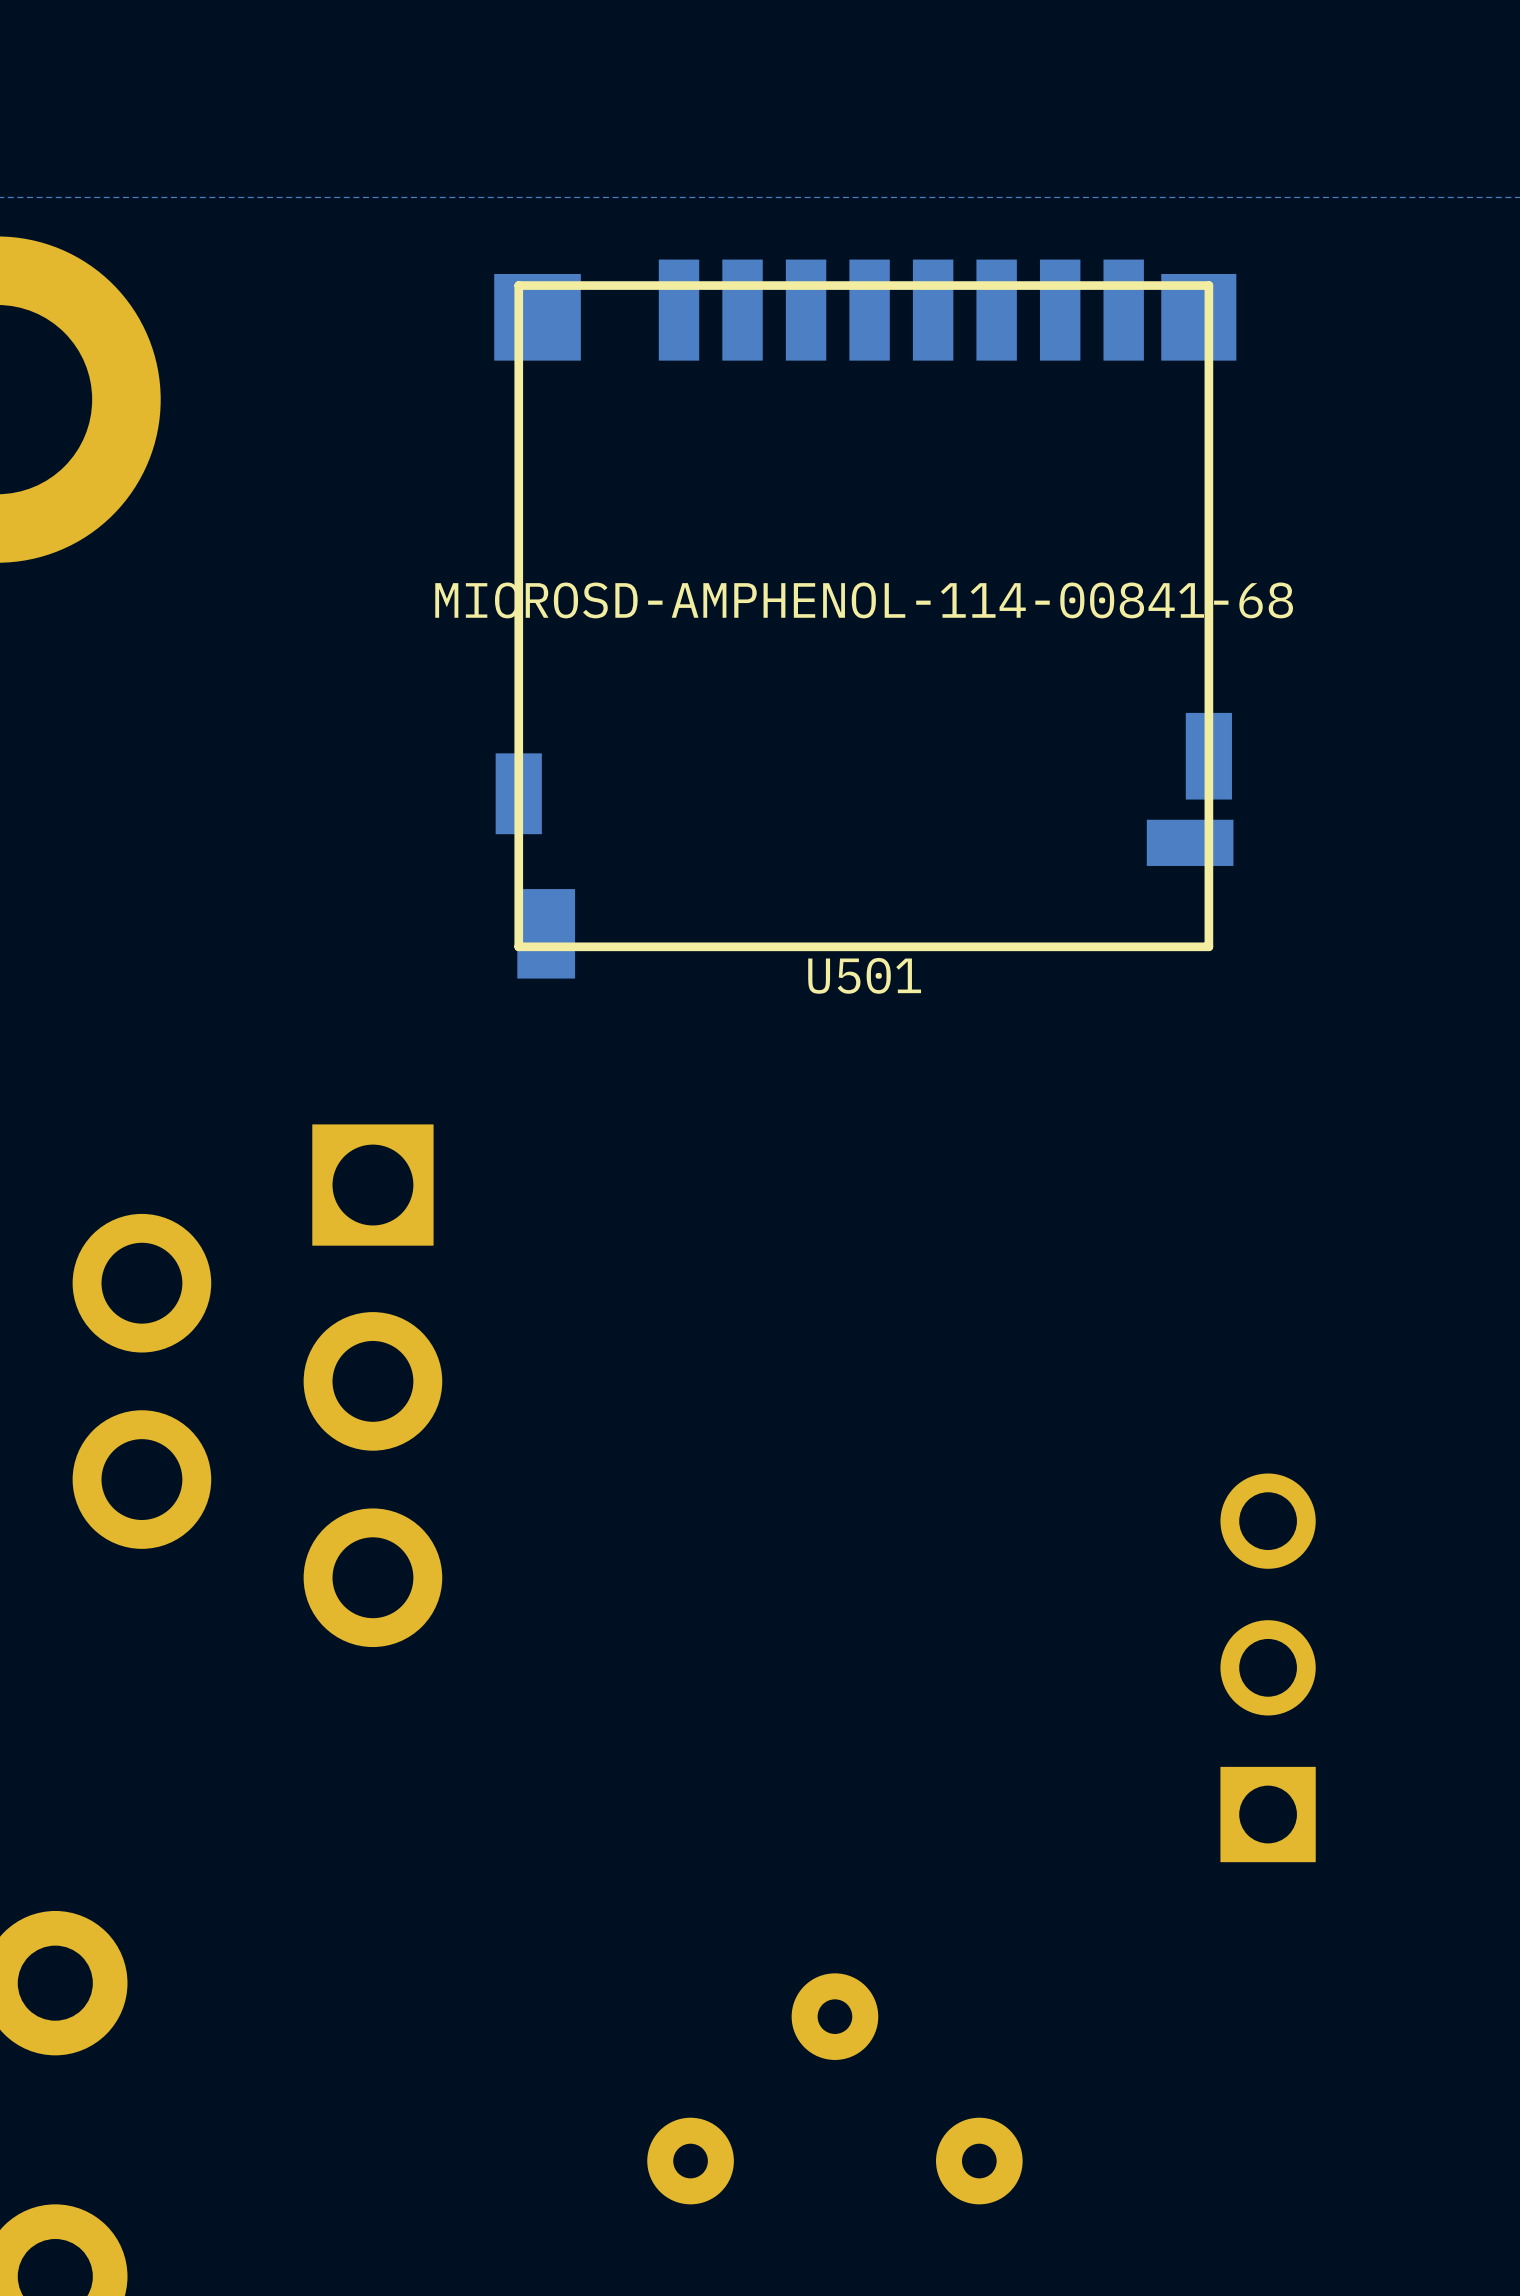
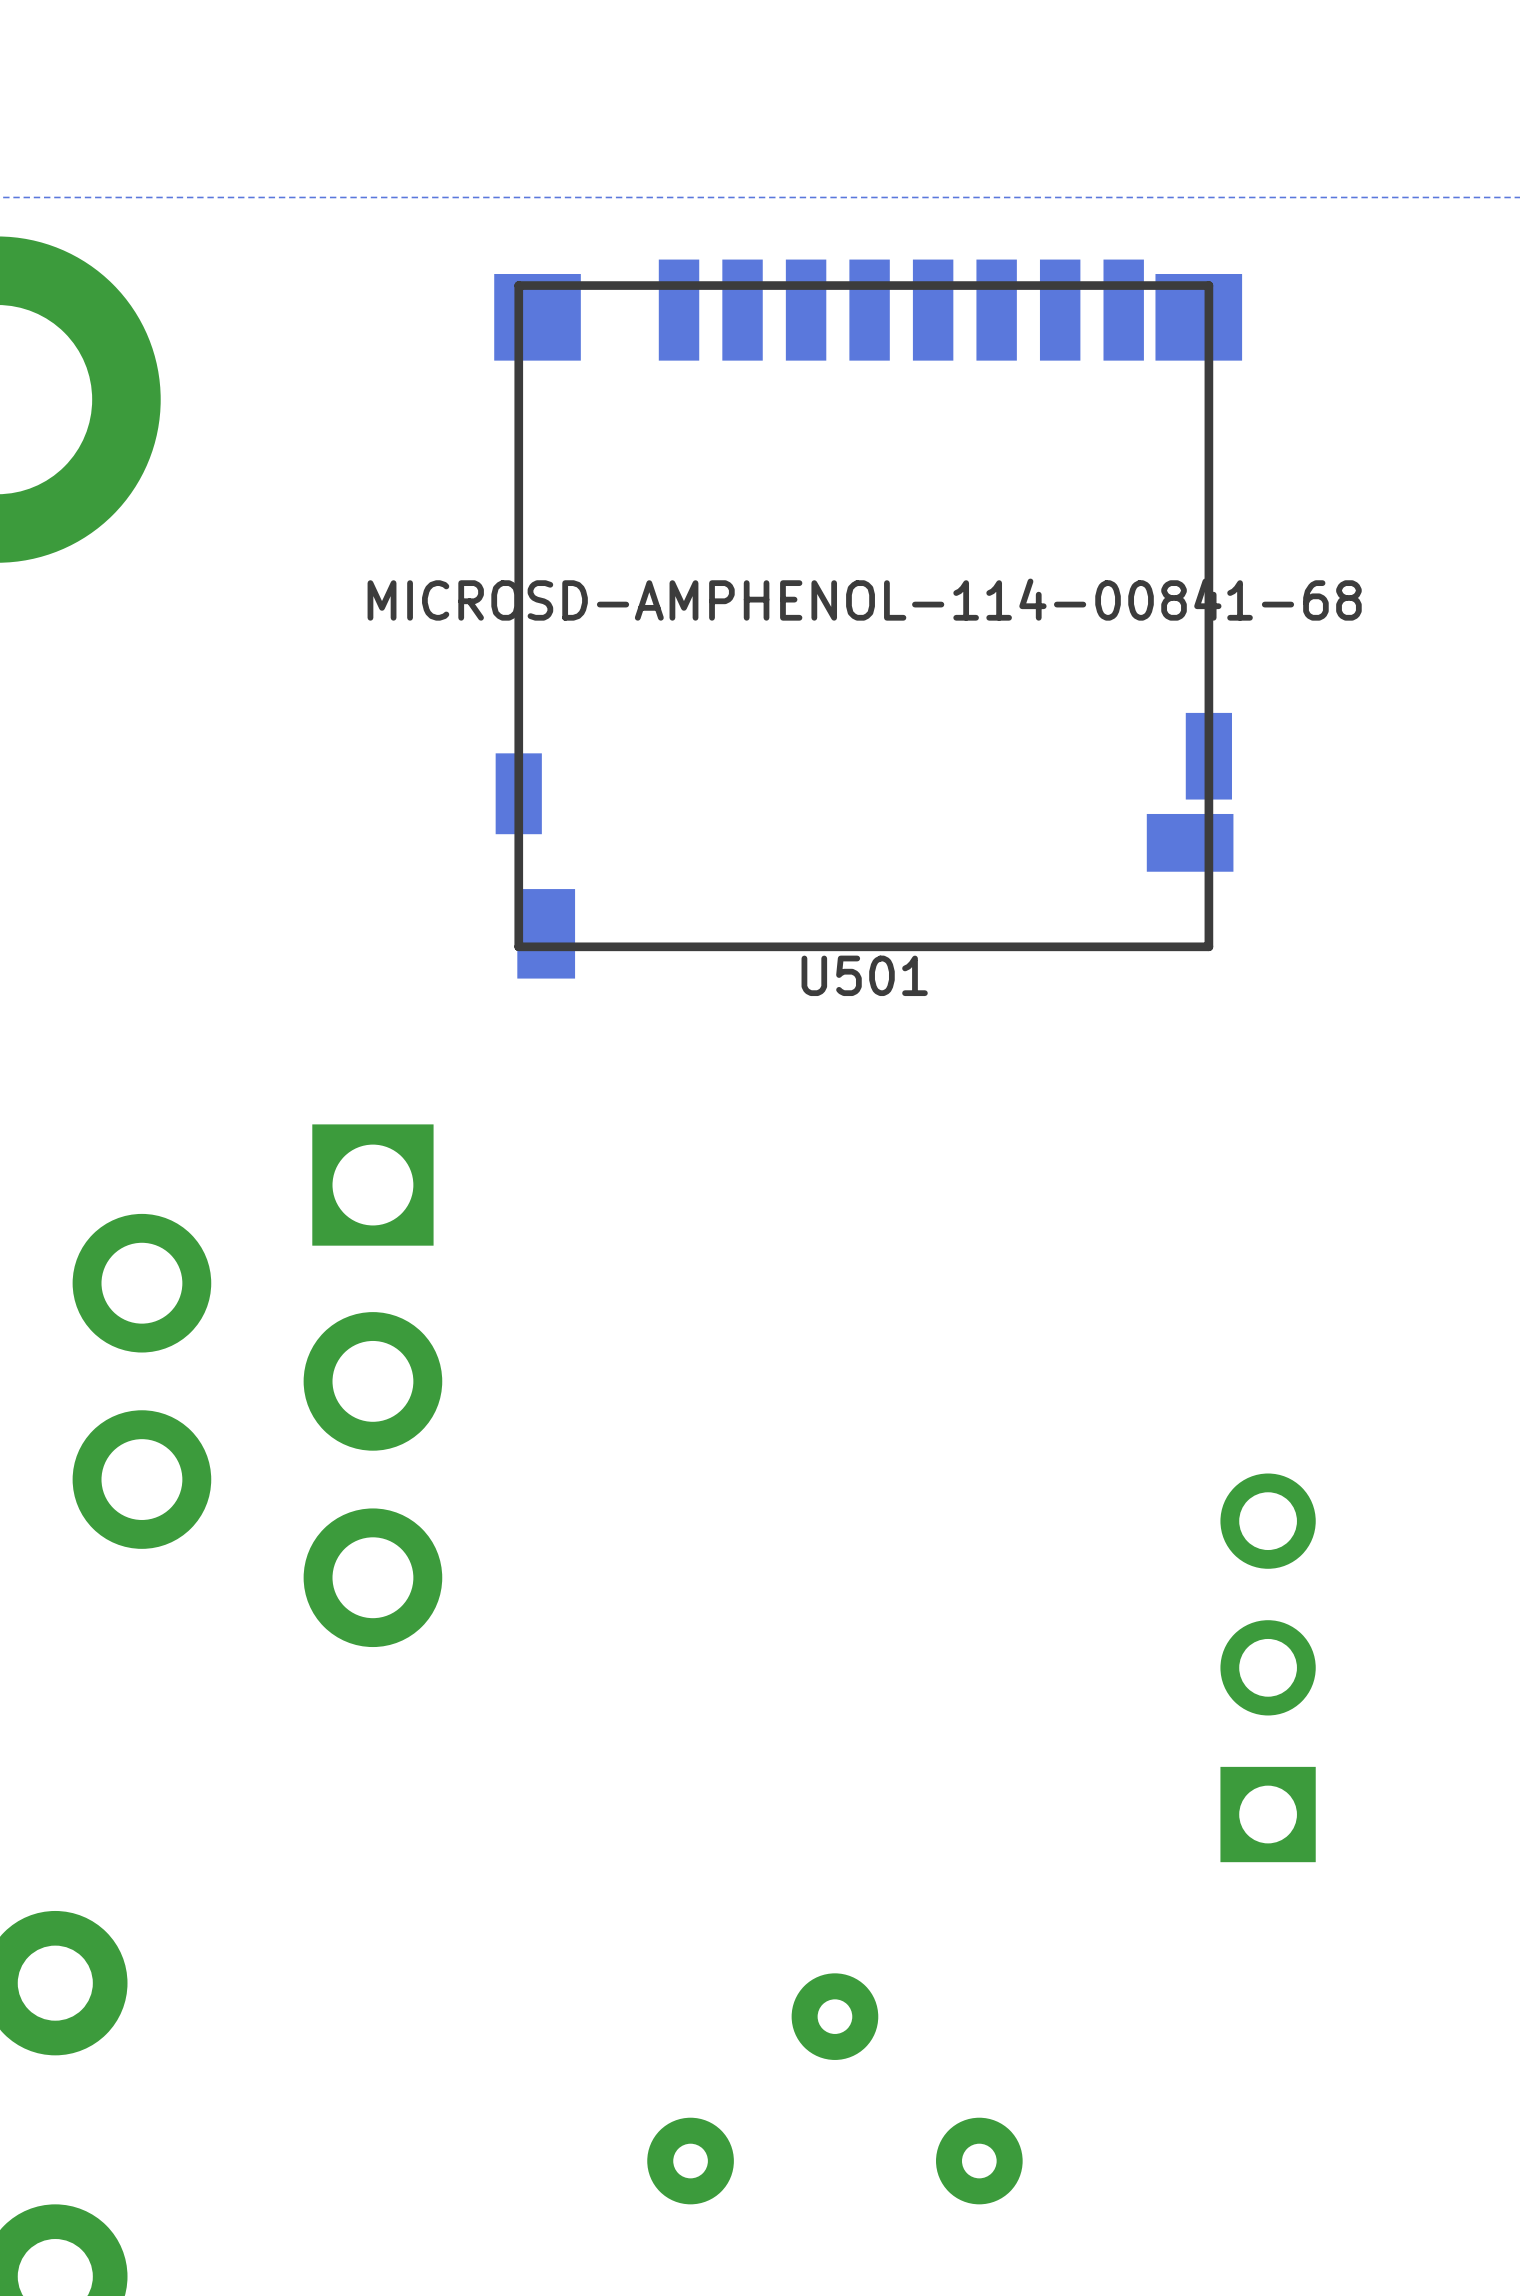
U501 footprint: [494, 259, 1237, 979] -> [494, 259, 1243, 979]

